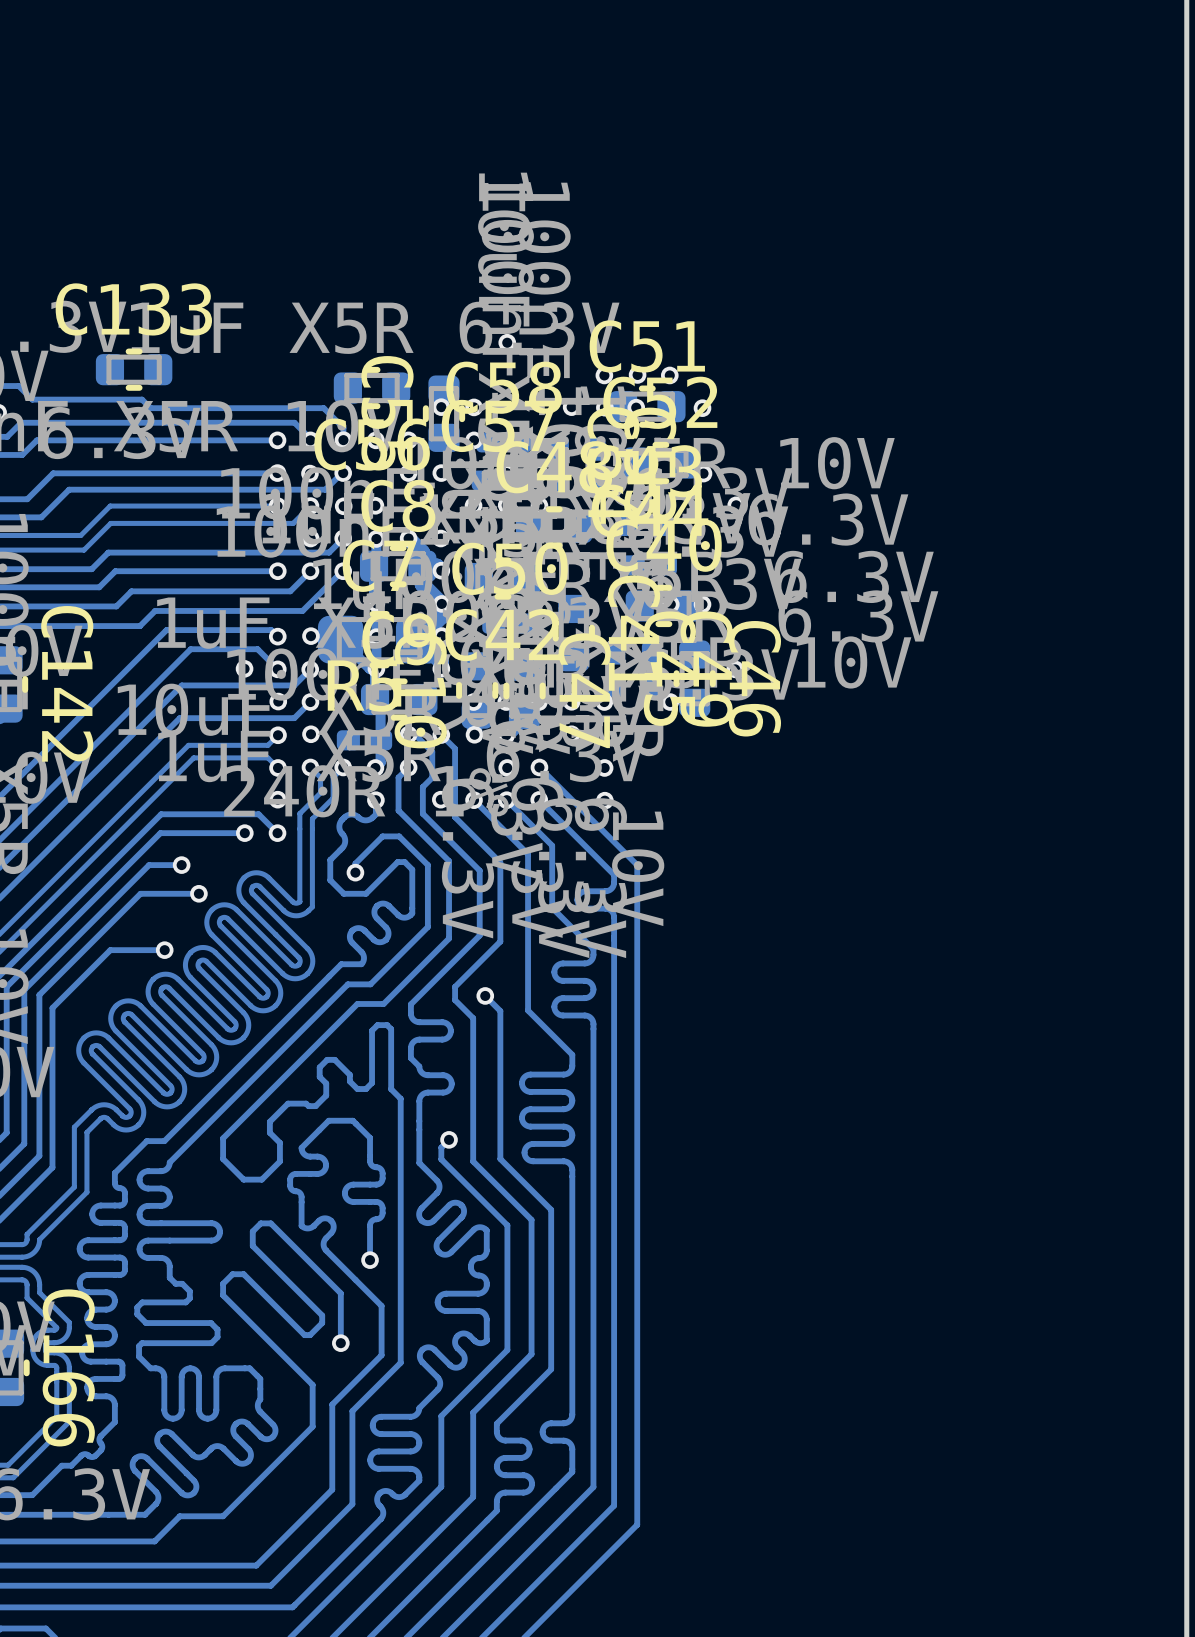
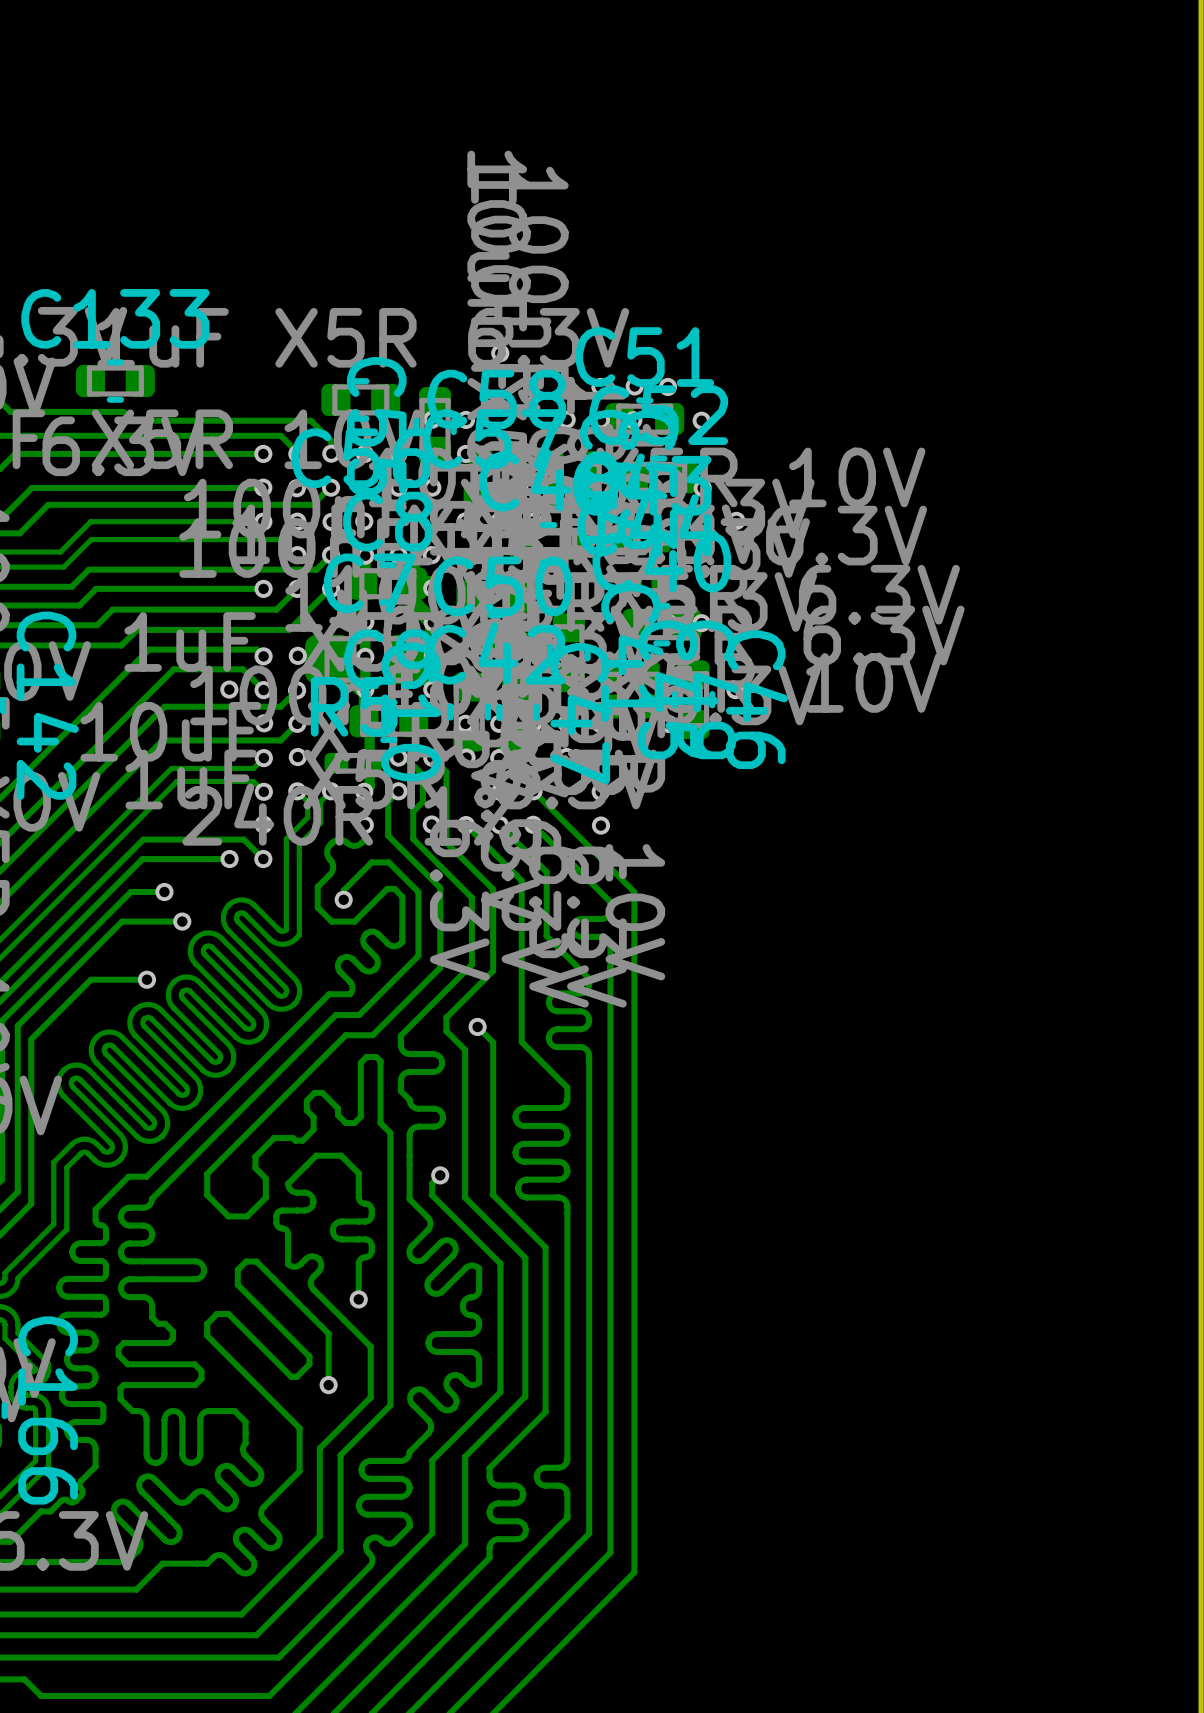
track: (277, 1461) (228, 1510) -> (263, 1507) (261, 1512) (262, 1517) (279, 1536) (277, 1545) (271, 1548) (266, 1547) (246, 1529) (240, 1531) (236, 1536) (237, 1544) (253, 1560) (254, 1565) (251, 1570) (247, 1573) (241, 1572) (222, 1555) (213, 1557)

